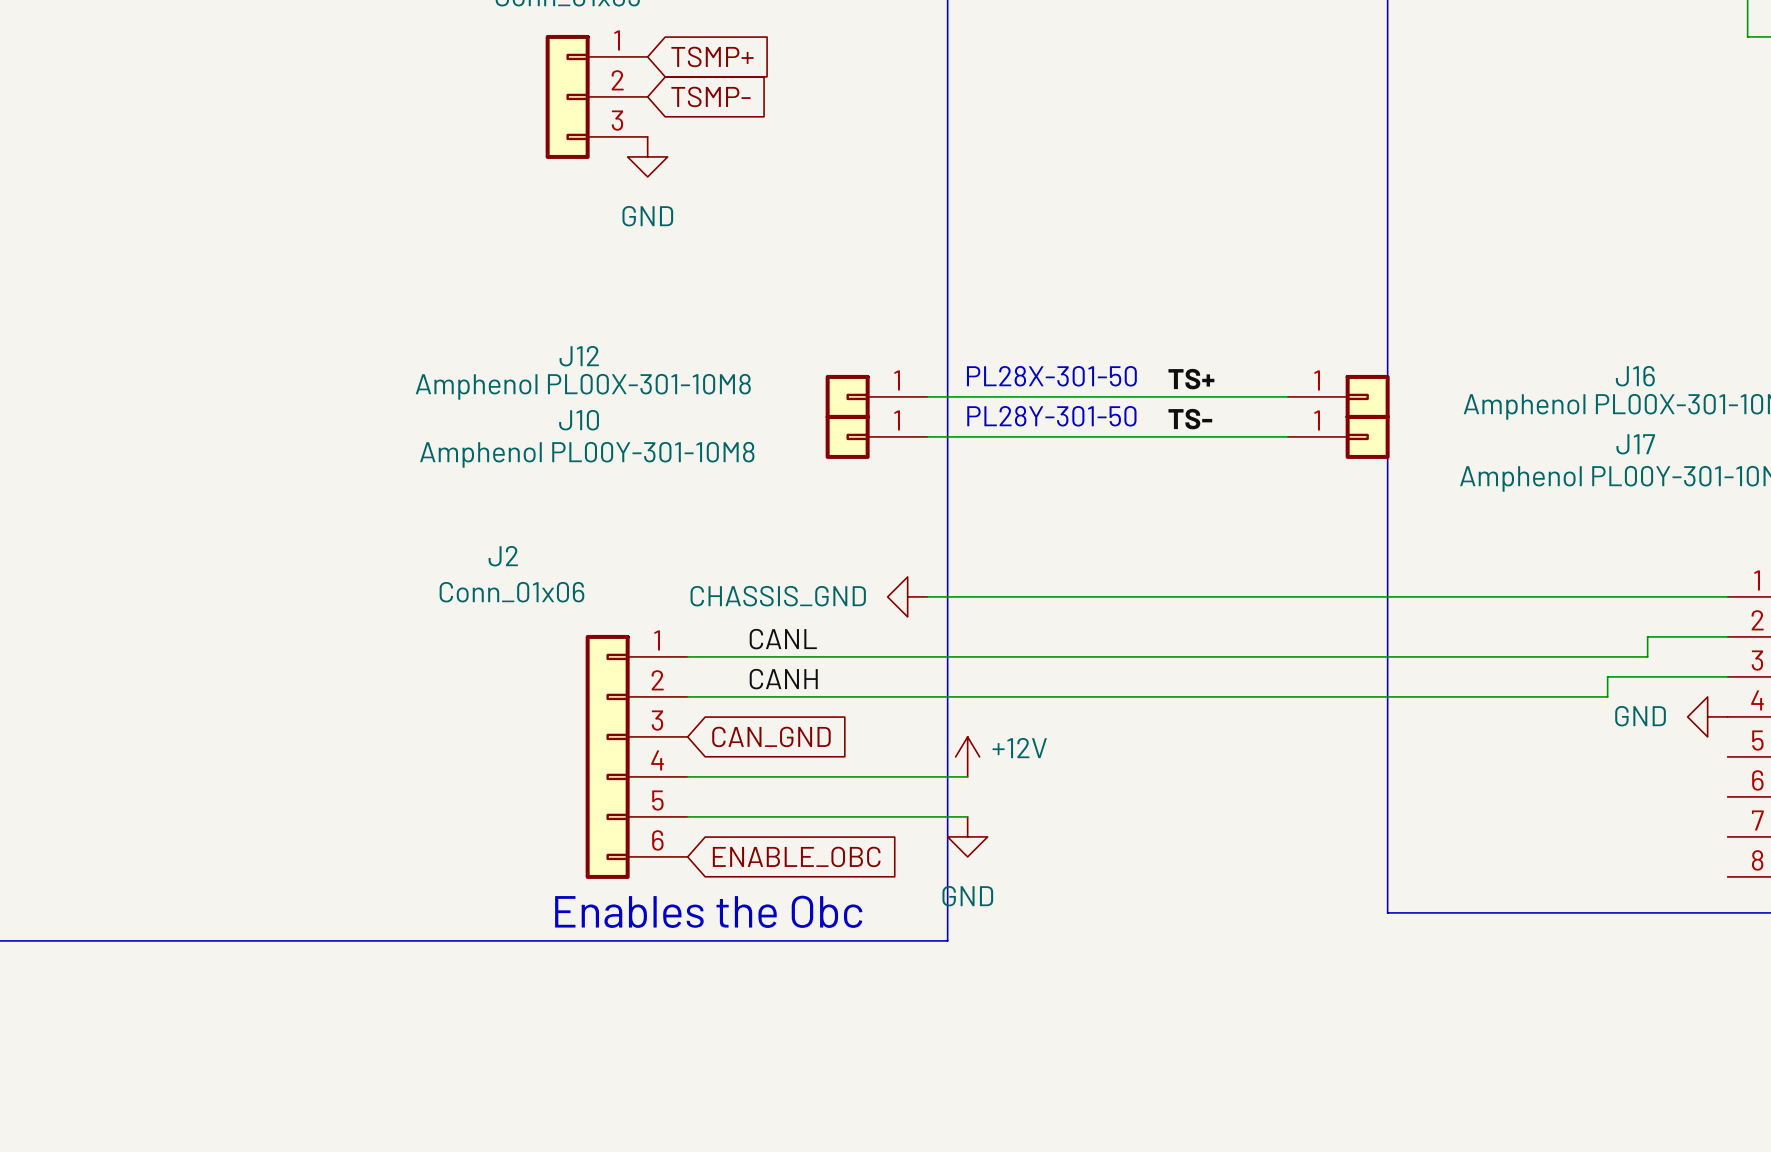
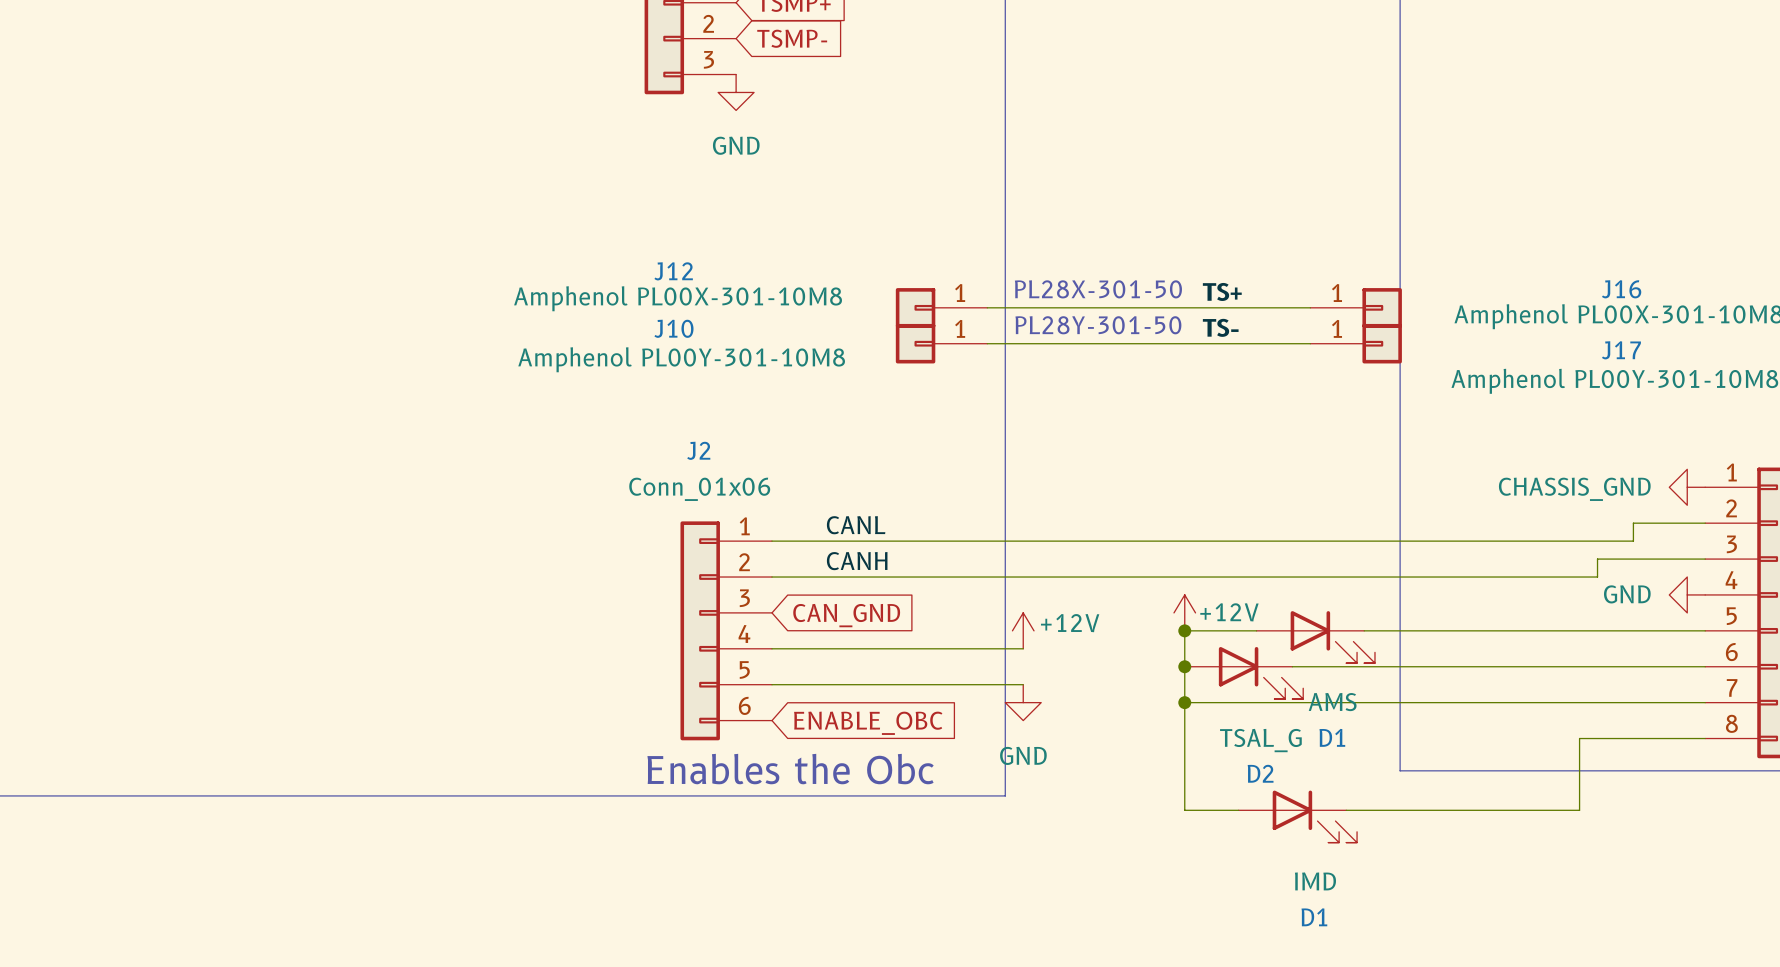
J2 name position: J2 (503, 556) -> J2 (698, 450)
J2 value position: Conn_01x06 (511, 592) -> Conn_01x06 (699, 489)
power symbol: CHASSIS_GND (907, 596) -> none
wire: (927, 596) (1727, 596) -> none
power symbol: none -> CHASSIS_GND (1687, 487)
power symbol: none -> +12V (1184, 612)
junction: none -> (1184, 630)
wire: none -> (1256, 630) (1184, 630) (1184, 810) (1238, 810)
wire: none -> (1364, 630) (1705, 630)
D1: none -> AMS (1315, 637)
junction: none -> (1184, 666)
wire: none -> (1292, 666) (1705, 666)
D2: none -> TSAL_G (1243, 673)
wire: none -> (1184, 702) (1705, 702)
junction: none -> (1184, 702)
wire: none -> (1705, 738) (1579, 738) (1579, 810) (1346, 810)
D1: none -> IMD (1297, 816)

